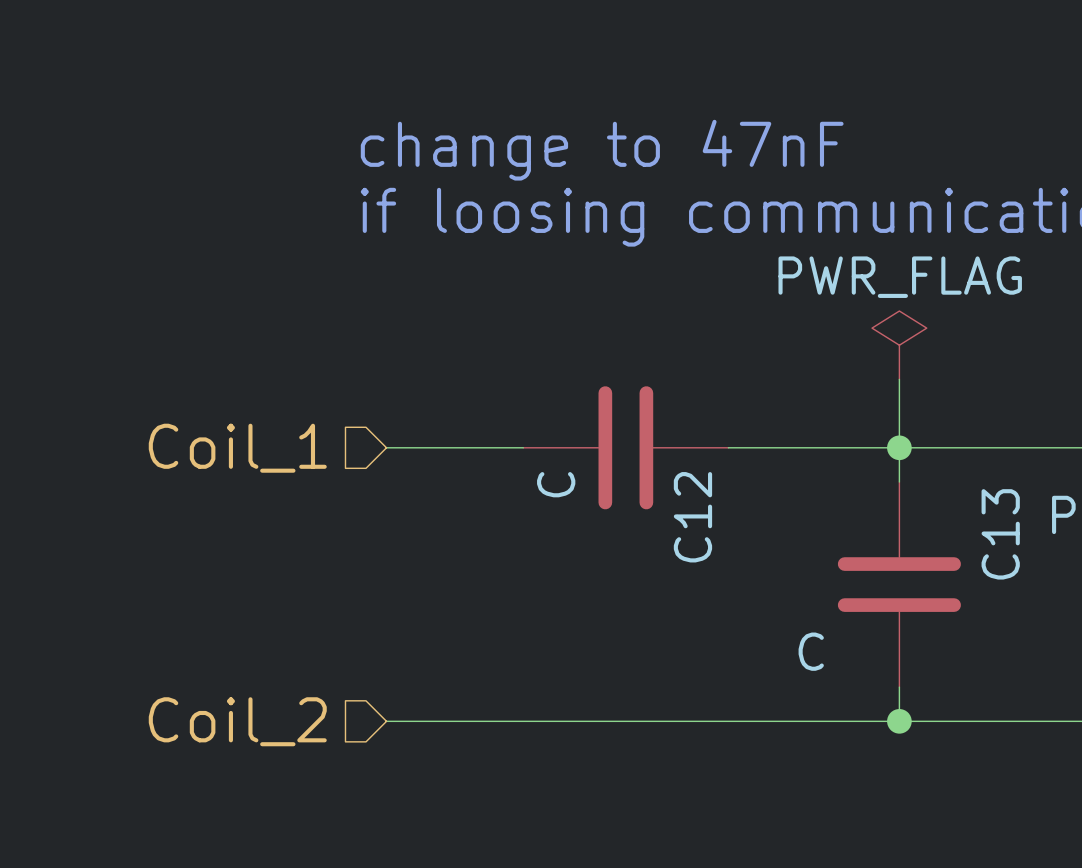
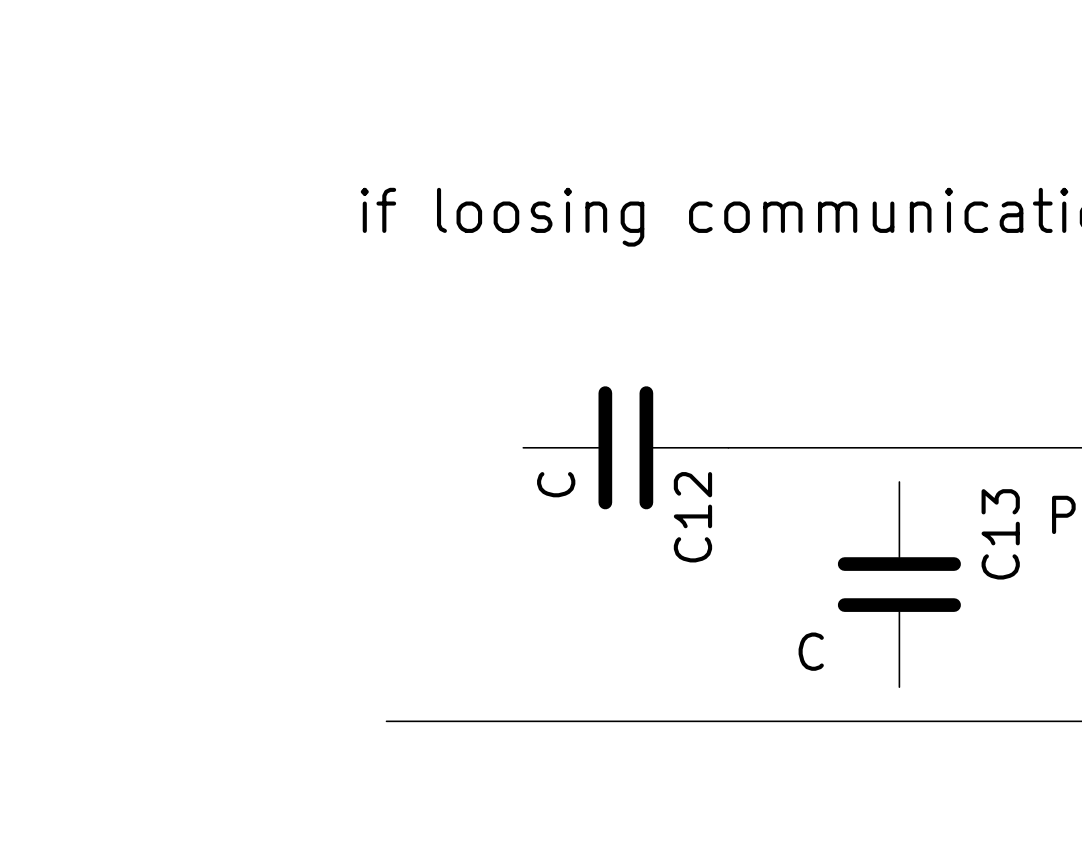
text: change to 47nF (602, 150) -> none
power symbol: PWR_FLAG (899, 345) -> none
wire: (899, 379) (899, 481) -> none
wire: (386, 447) (523, 447) -> none
junction: (899, 447) -> none
hierarchical label: Coil_1 (237, 448) -> none
wire: (899, 687) (899, 721) -> none
hierarchical label: Coil_2 (237, 721) -> none
junction: (899, 721) -> none

